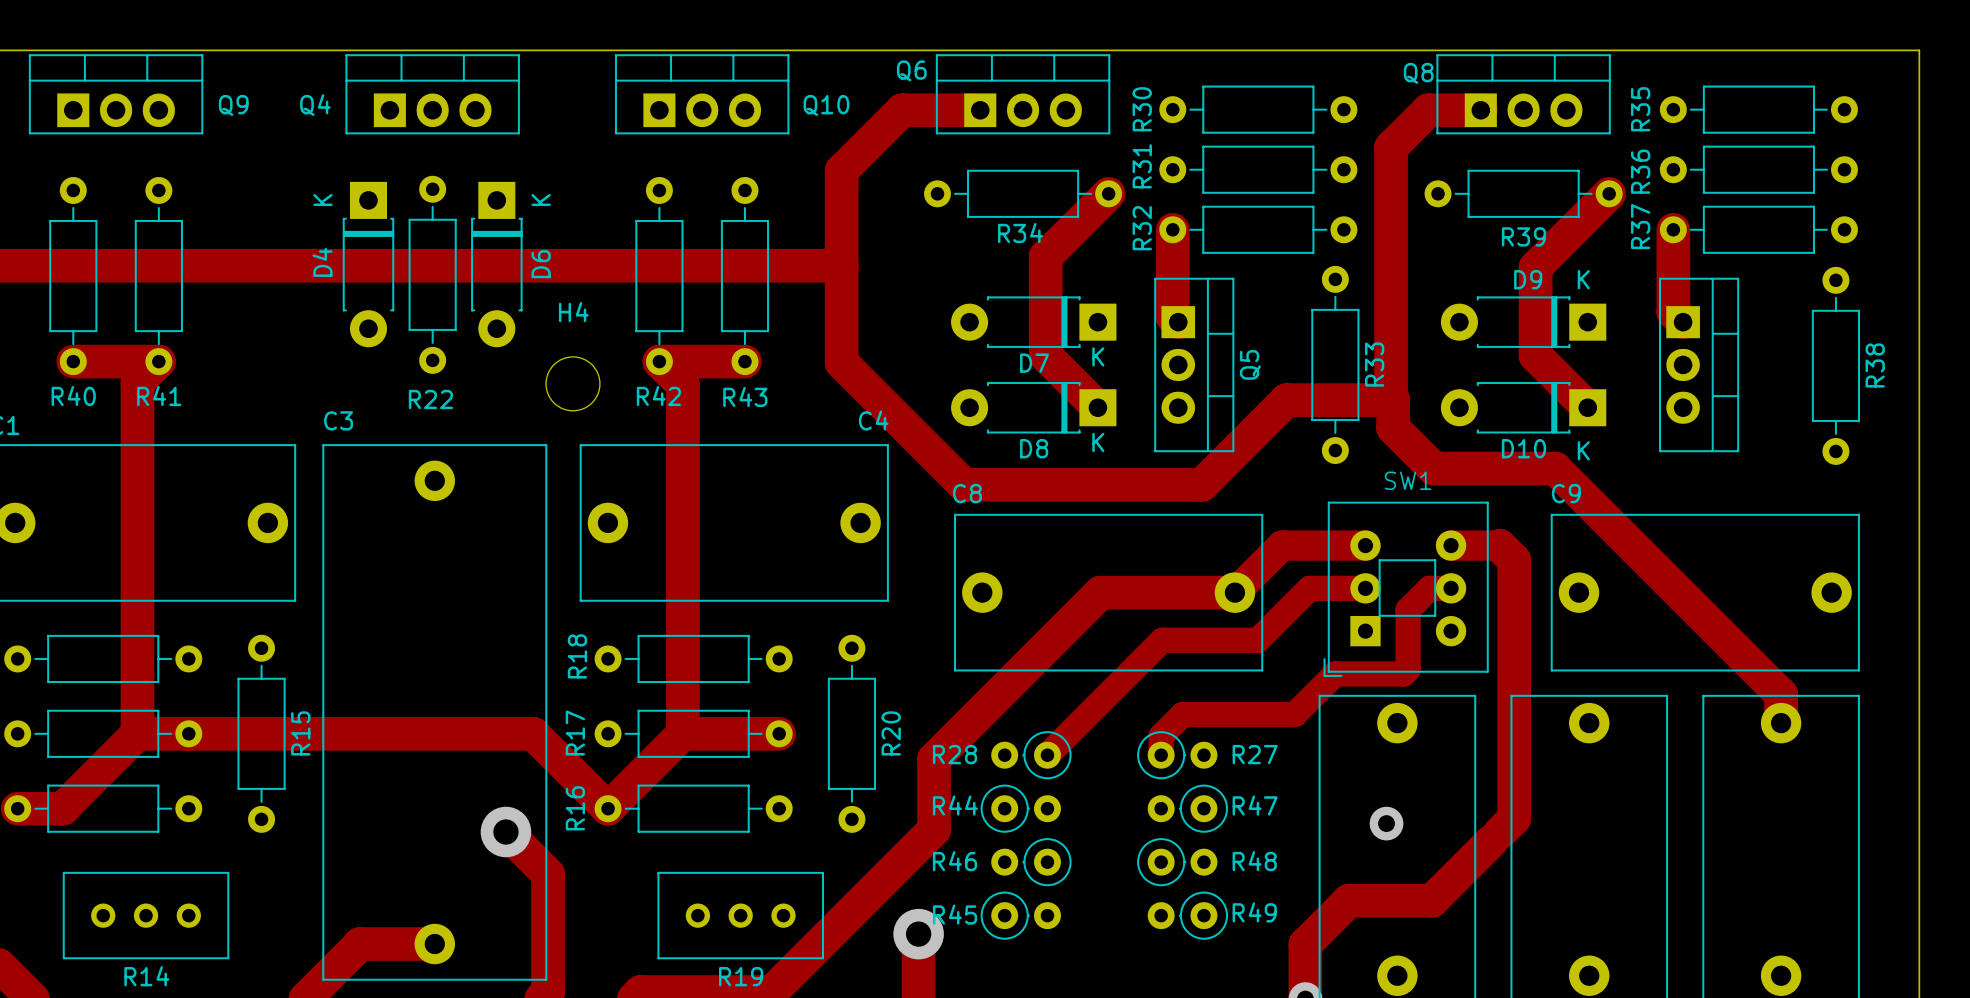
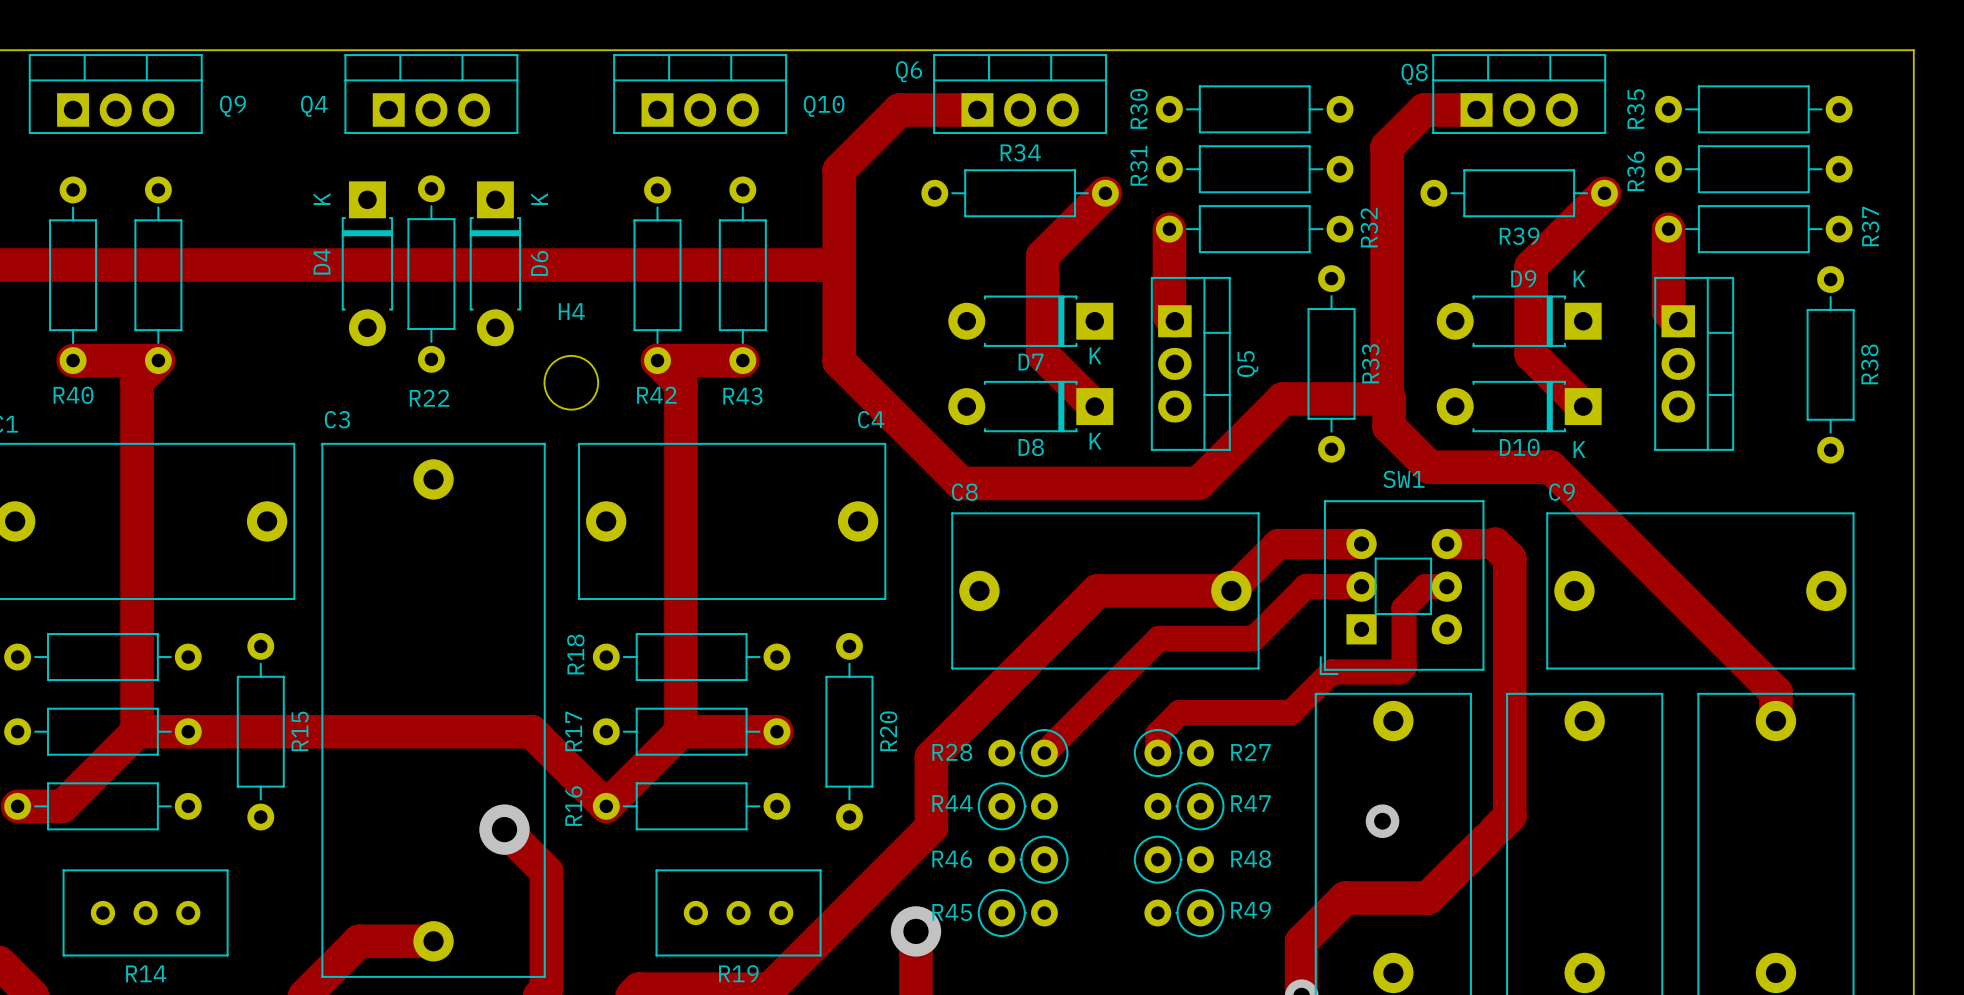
R37 name position: R37 (1640, 226) -> R37 (1870, 226)
R32 name position: R32 (1142, 228) -> R32 (1369, 227)
R34 name position: R34 (1020, 233) -> R34 (1020, 152)
R41 name: R41 (159, 396) -> none

